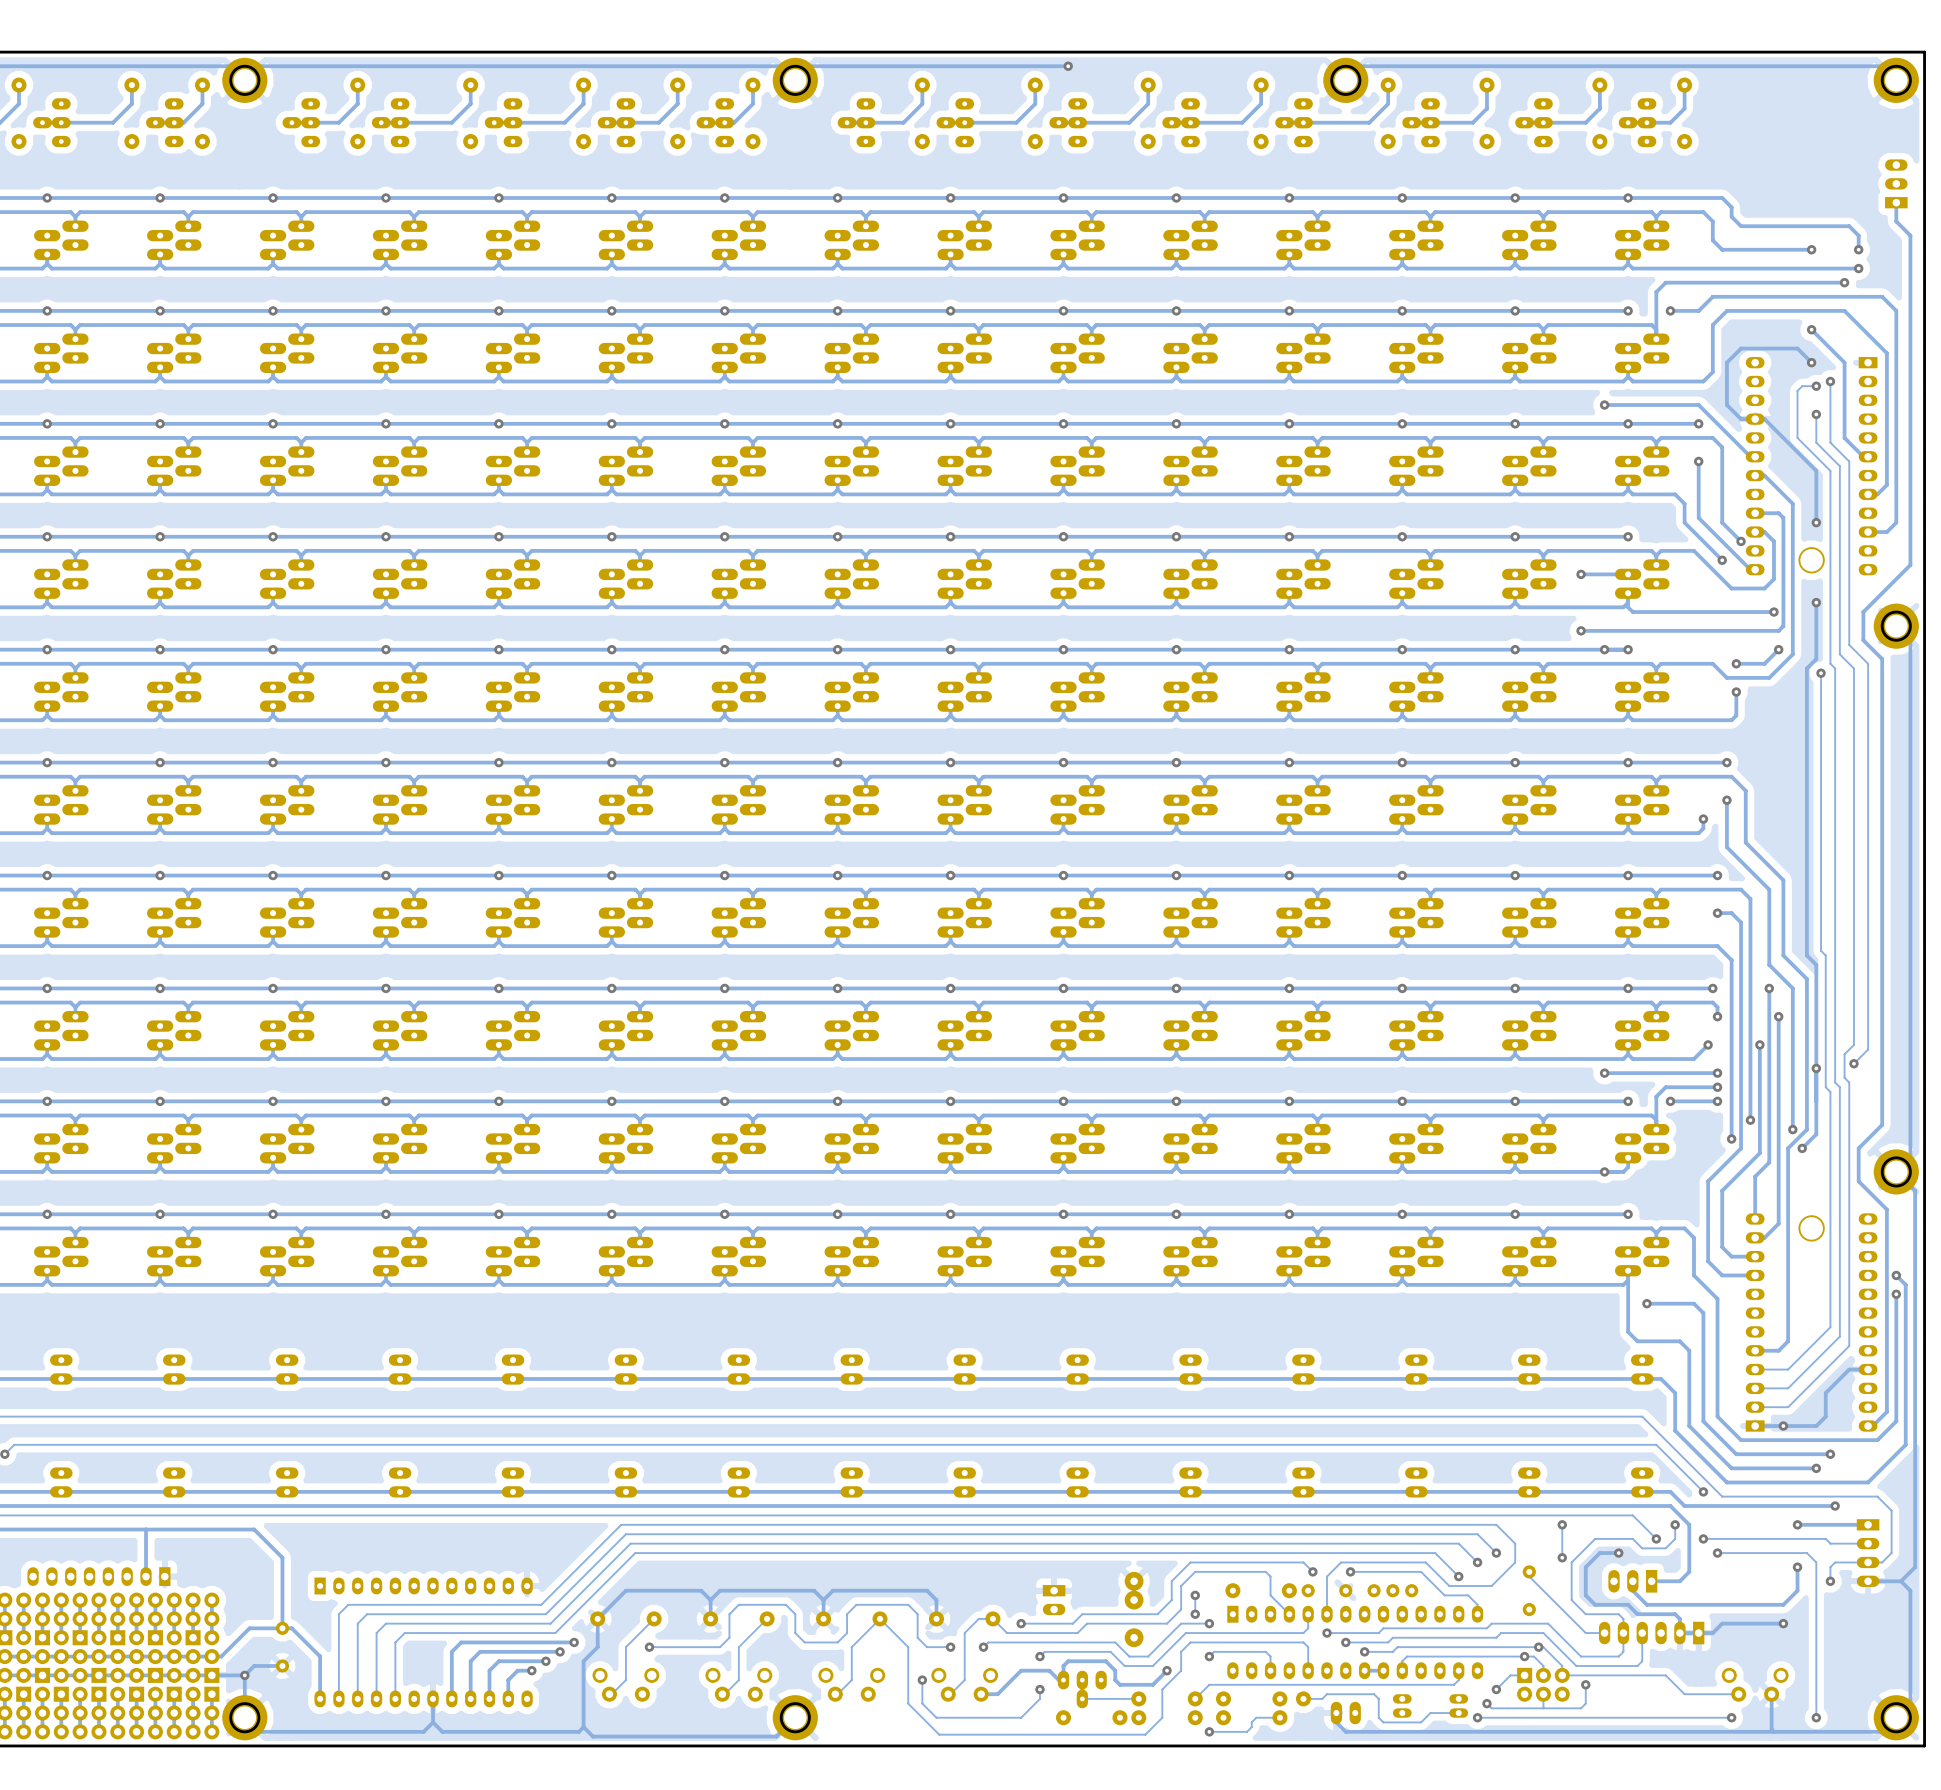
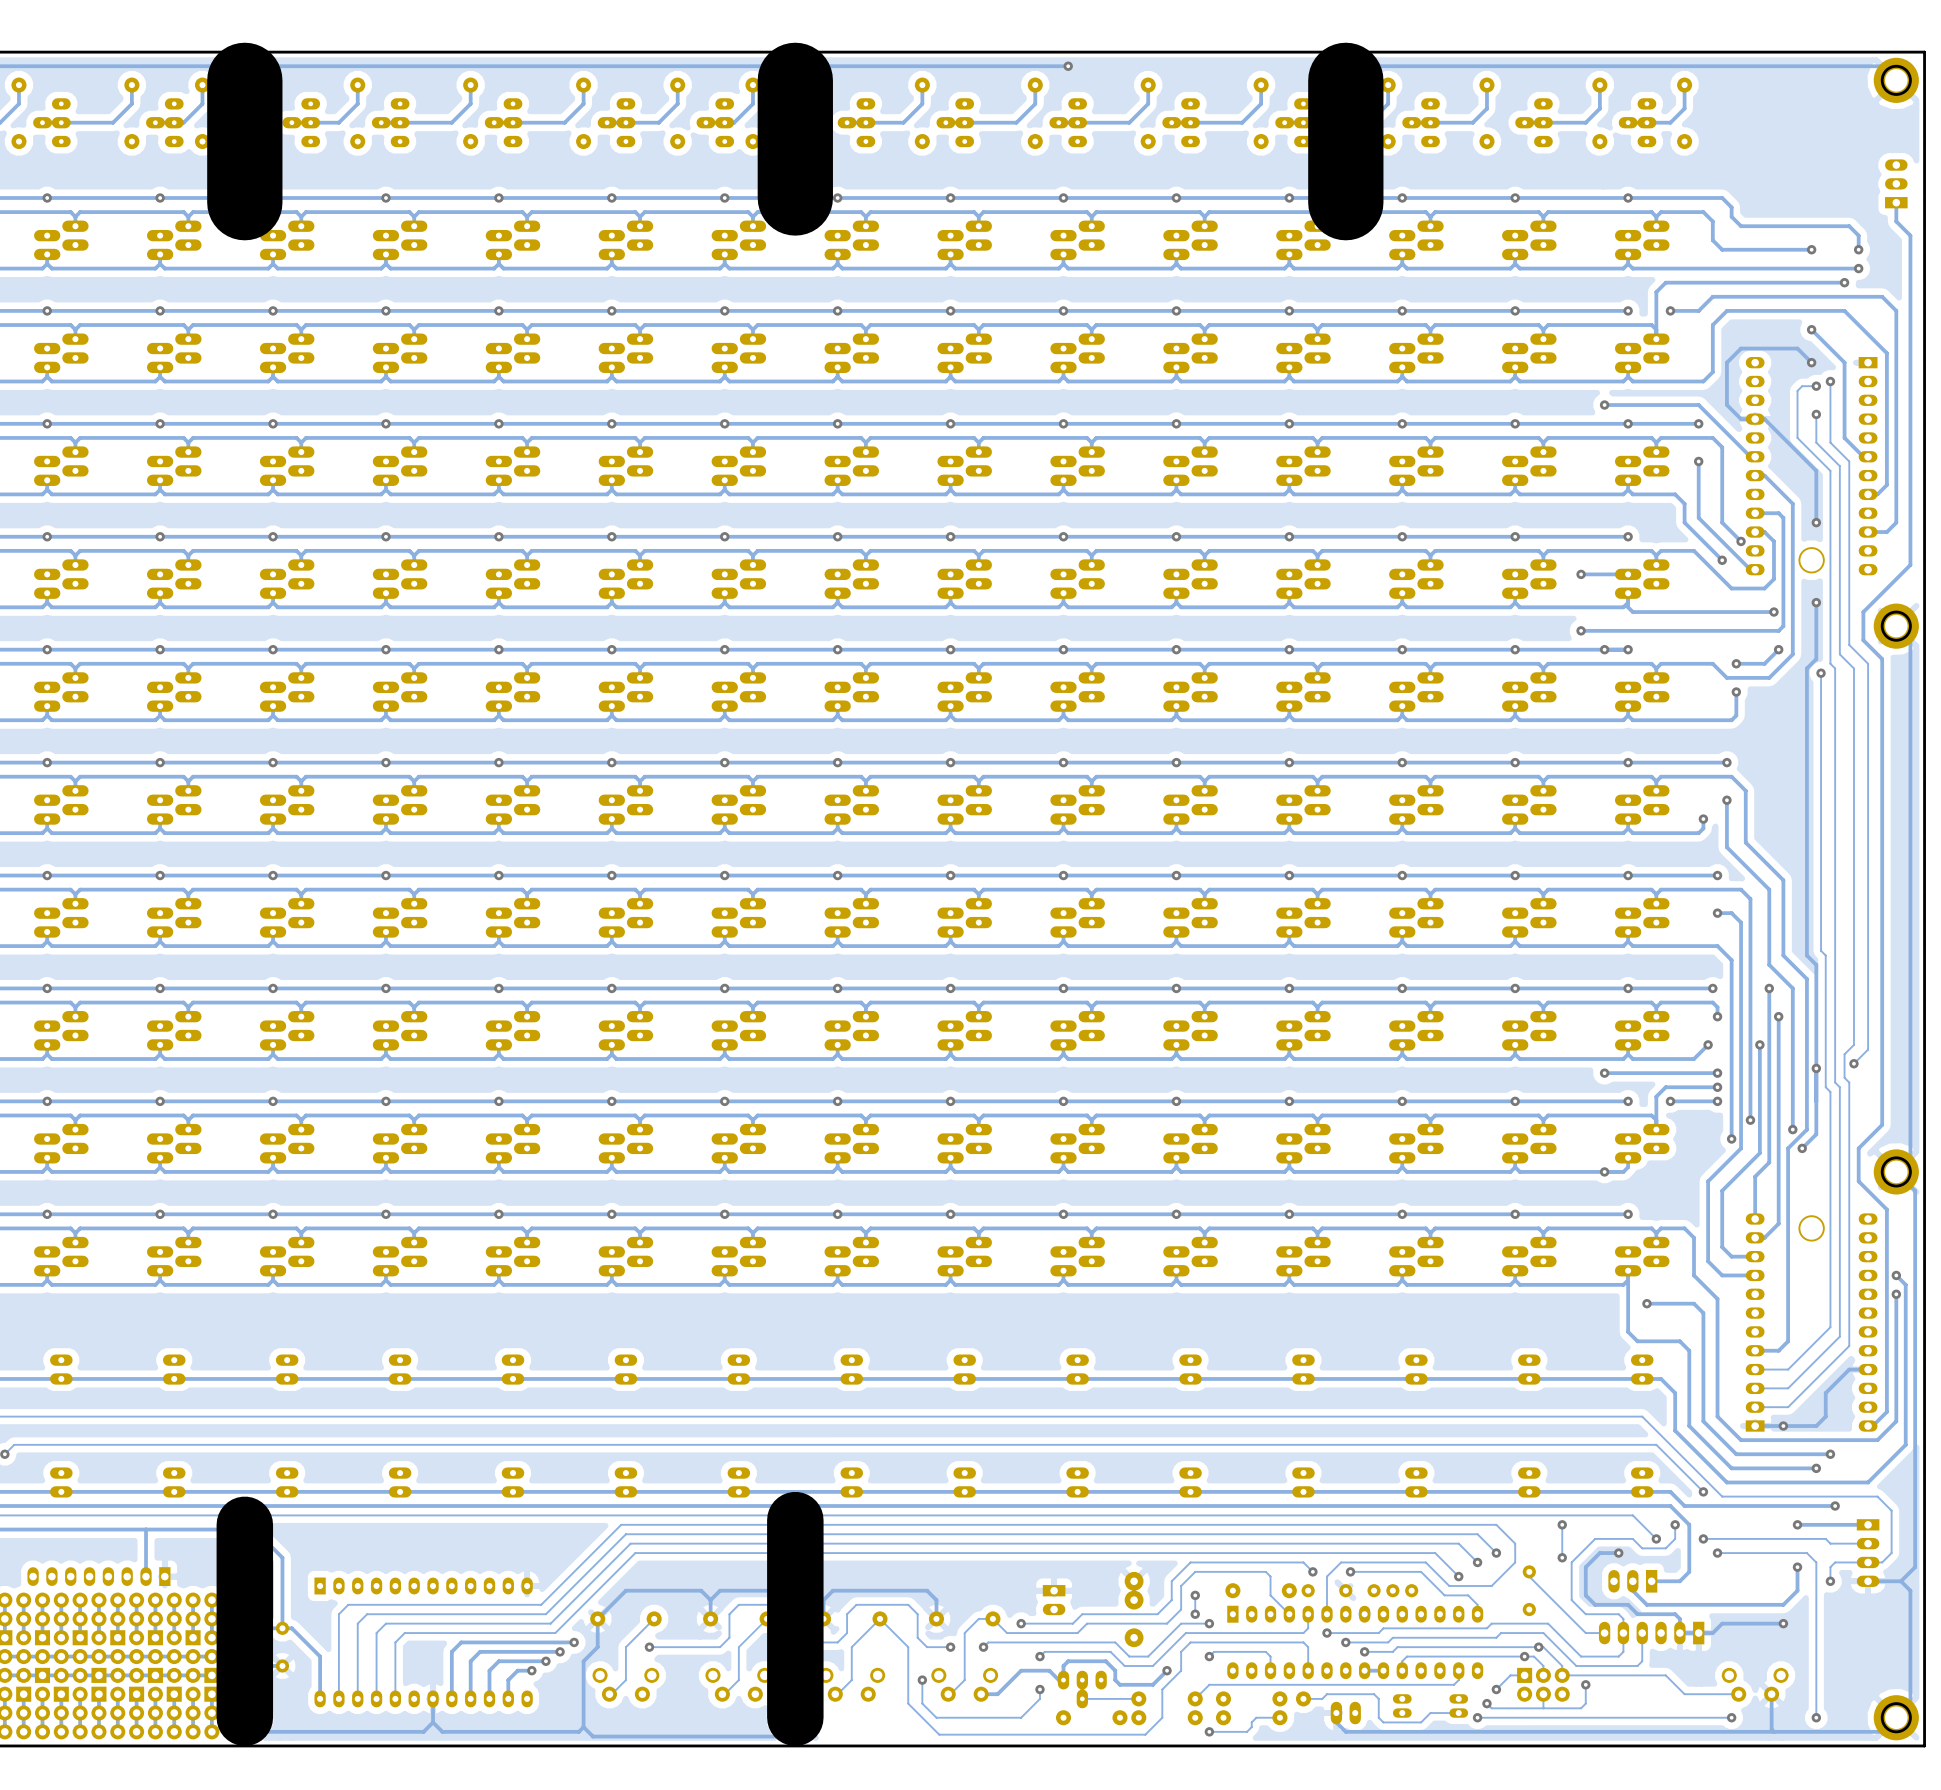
line: none -> (244, 80) (244, 202)
line: none -> (795, 80) (795, 197)
line: none -> (1345, 80) (1345, 202)
line: none -> (795, 1520) (795, 1717)
line: none -> (244, 1524) (244, 1717)

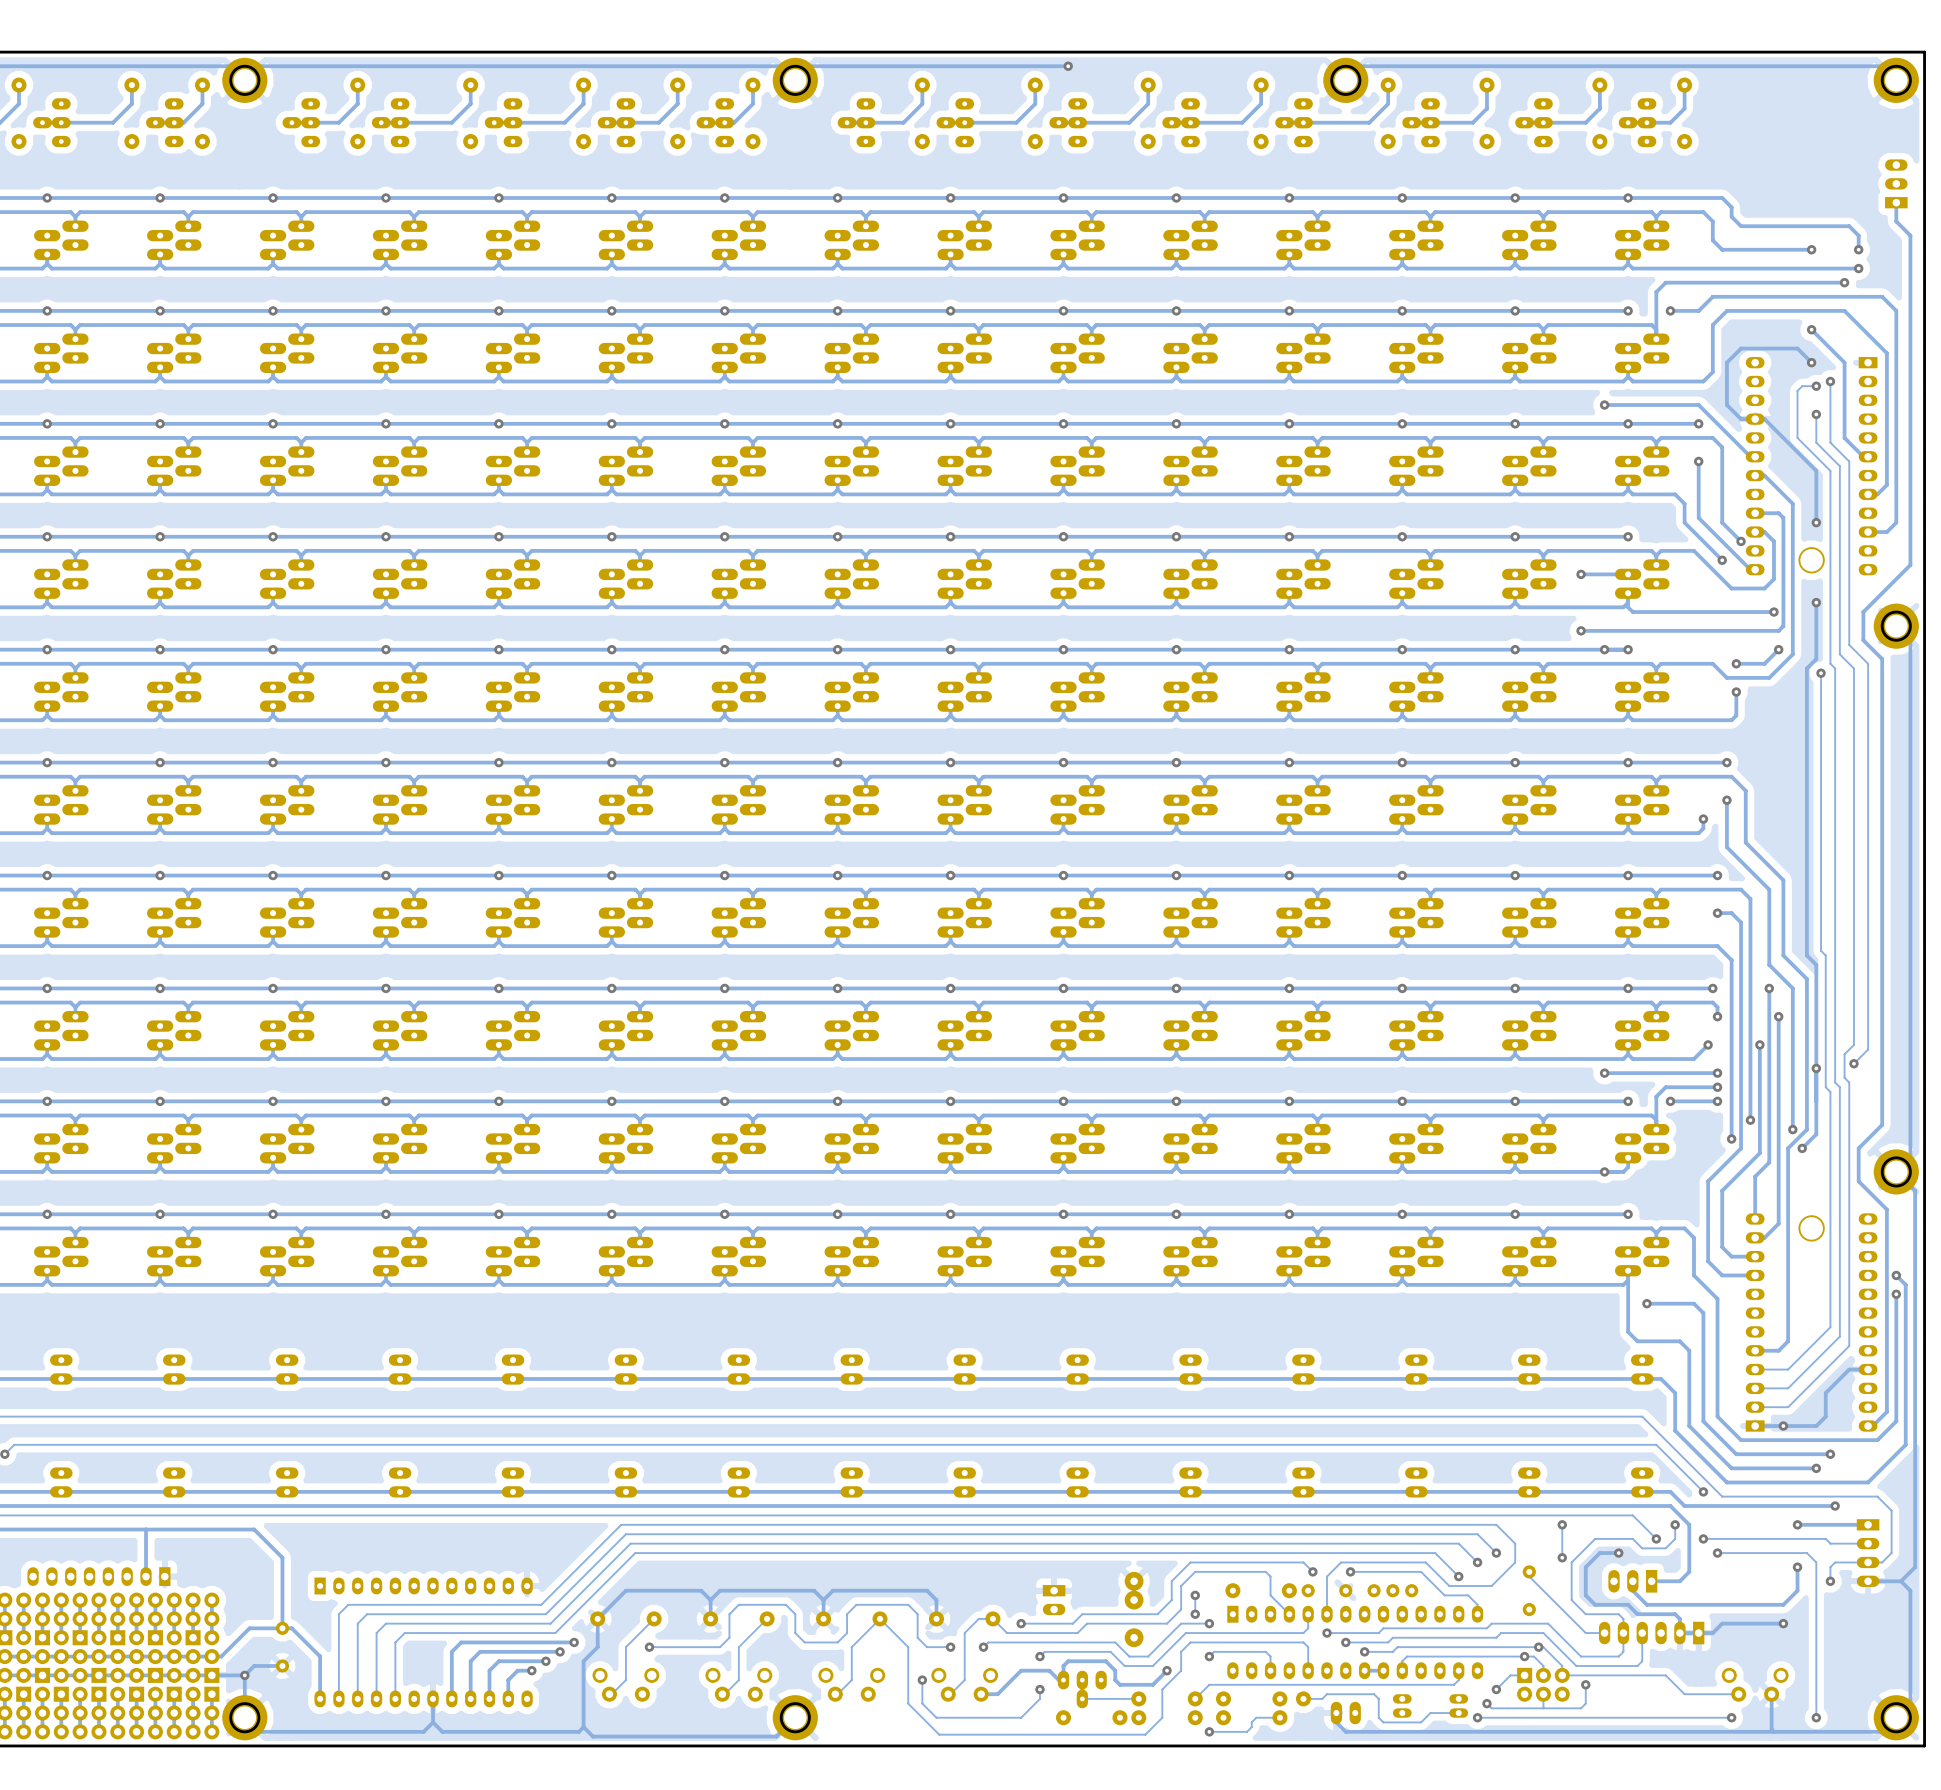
line: (244, 80) (244, 202) -> none
line: (795, 80) (795, 197) -> none
line: (1345, 80) (1345, 202) -> none
line: (795, 1520) (795, 1717) -> none
line: (244, 1524) (244, 1717) -> none

